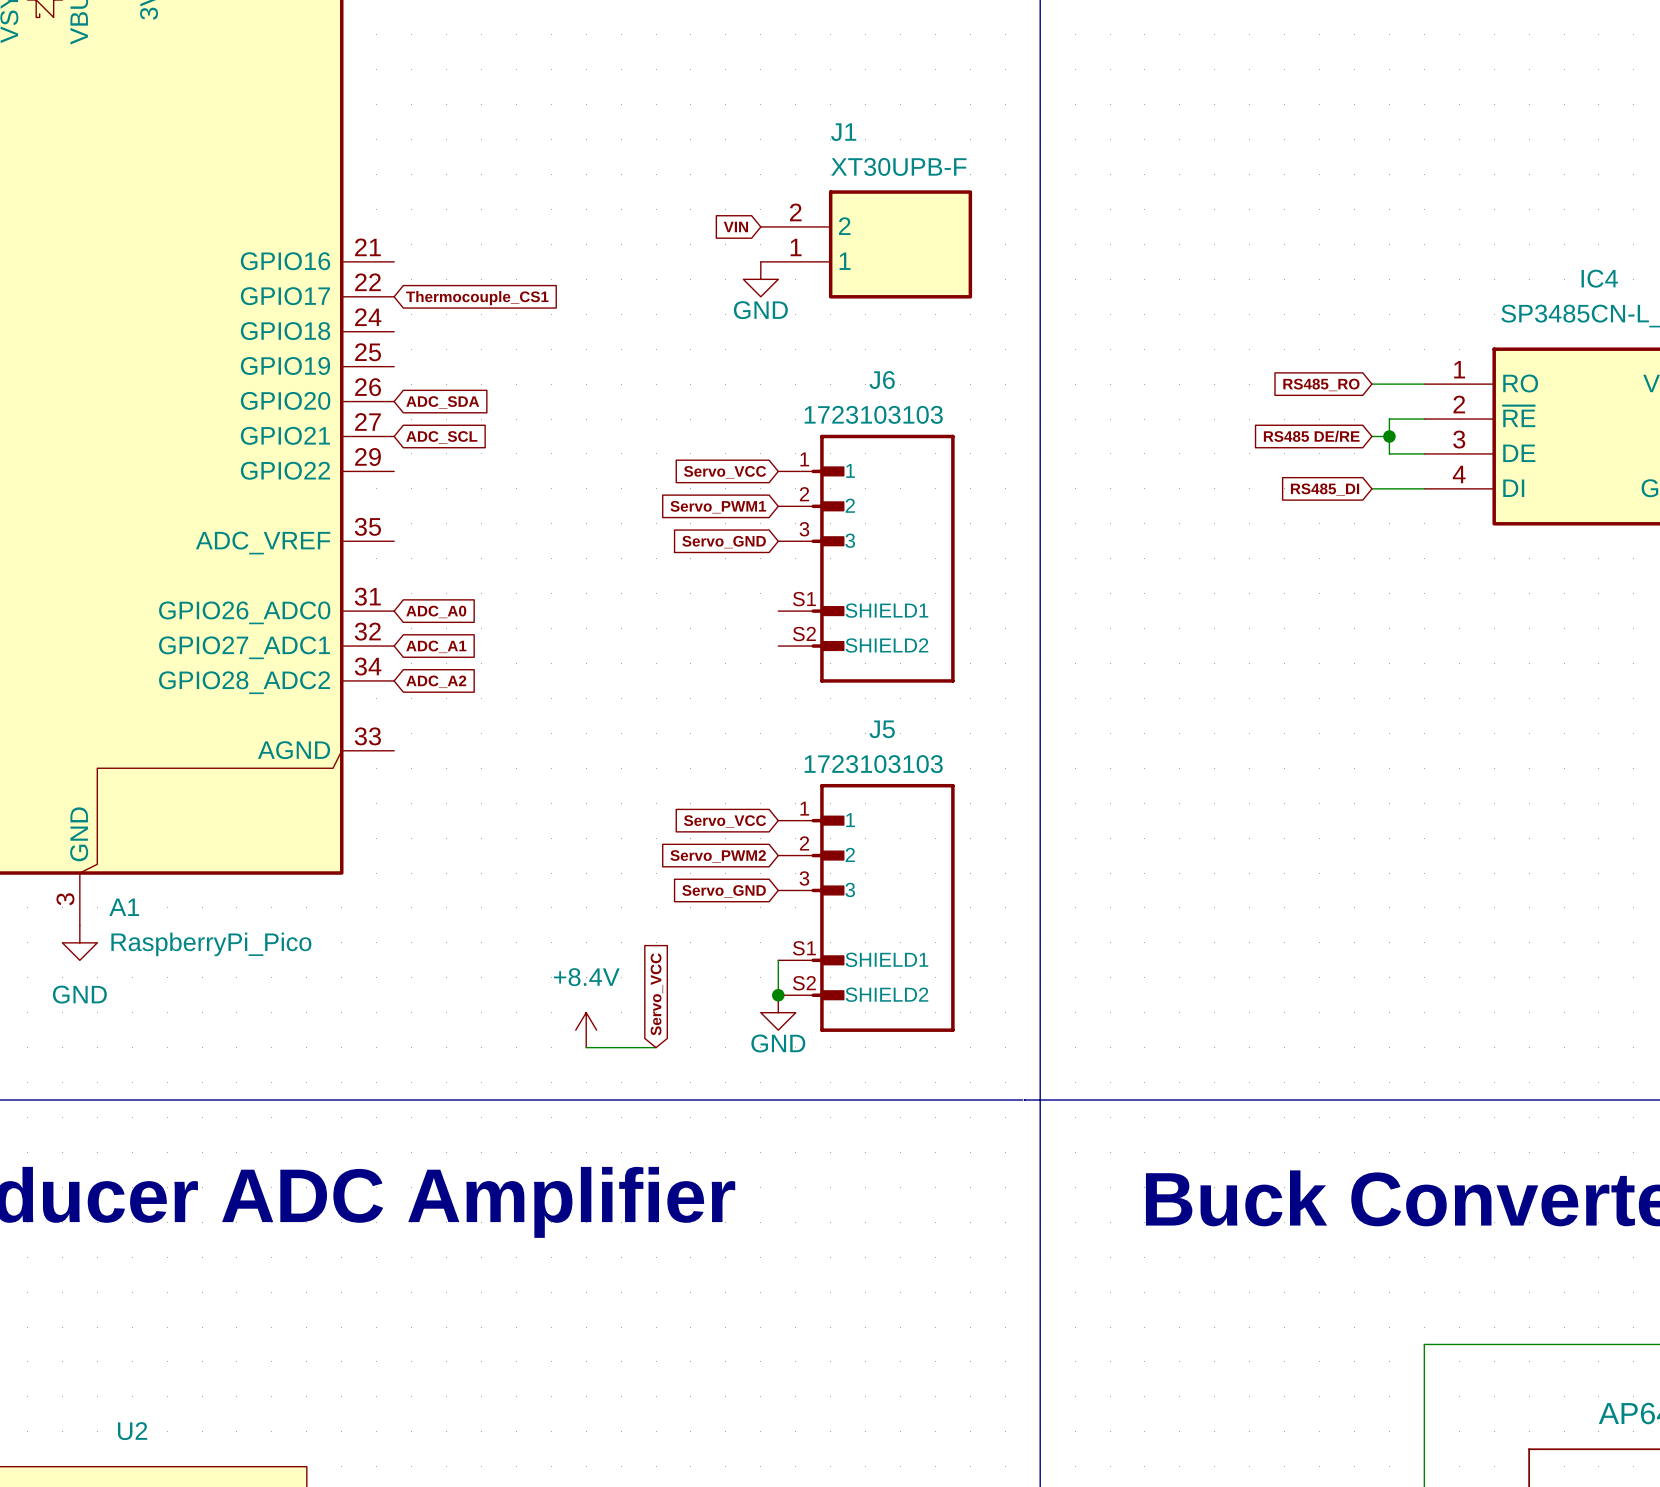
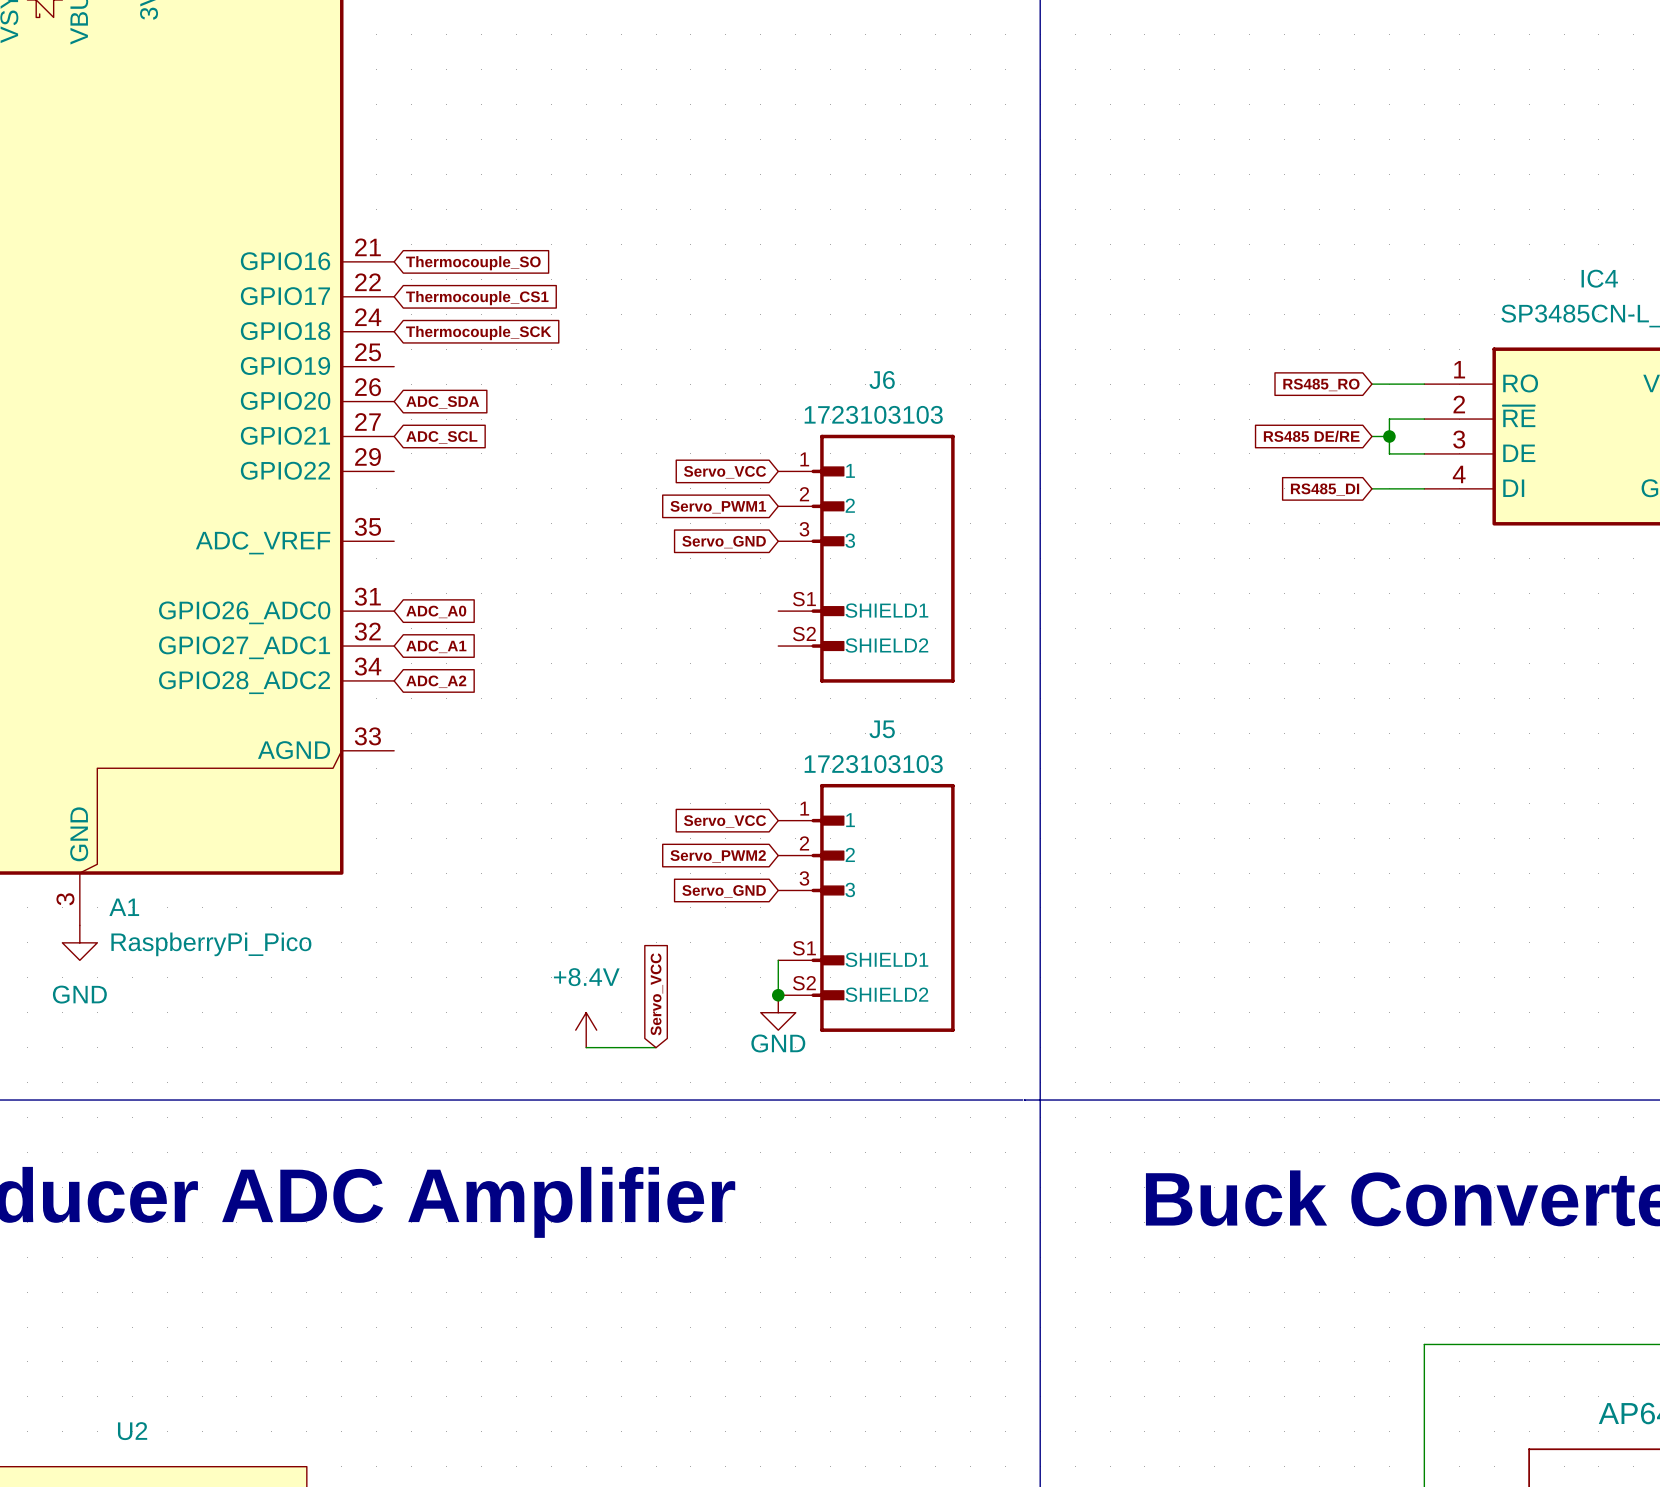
global label: VIN (735, 226) -> none
J1: XT30UPB-F (866, 244) -> none
global label: none -> Thermocouple_SO (473, 263)
power symbol: GND (760, 279) -> none
global label: none -> Thermocouple_SCK (478, 333)

